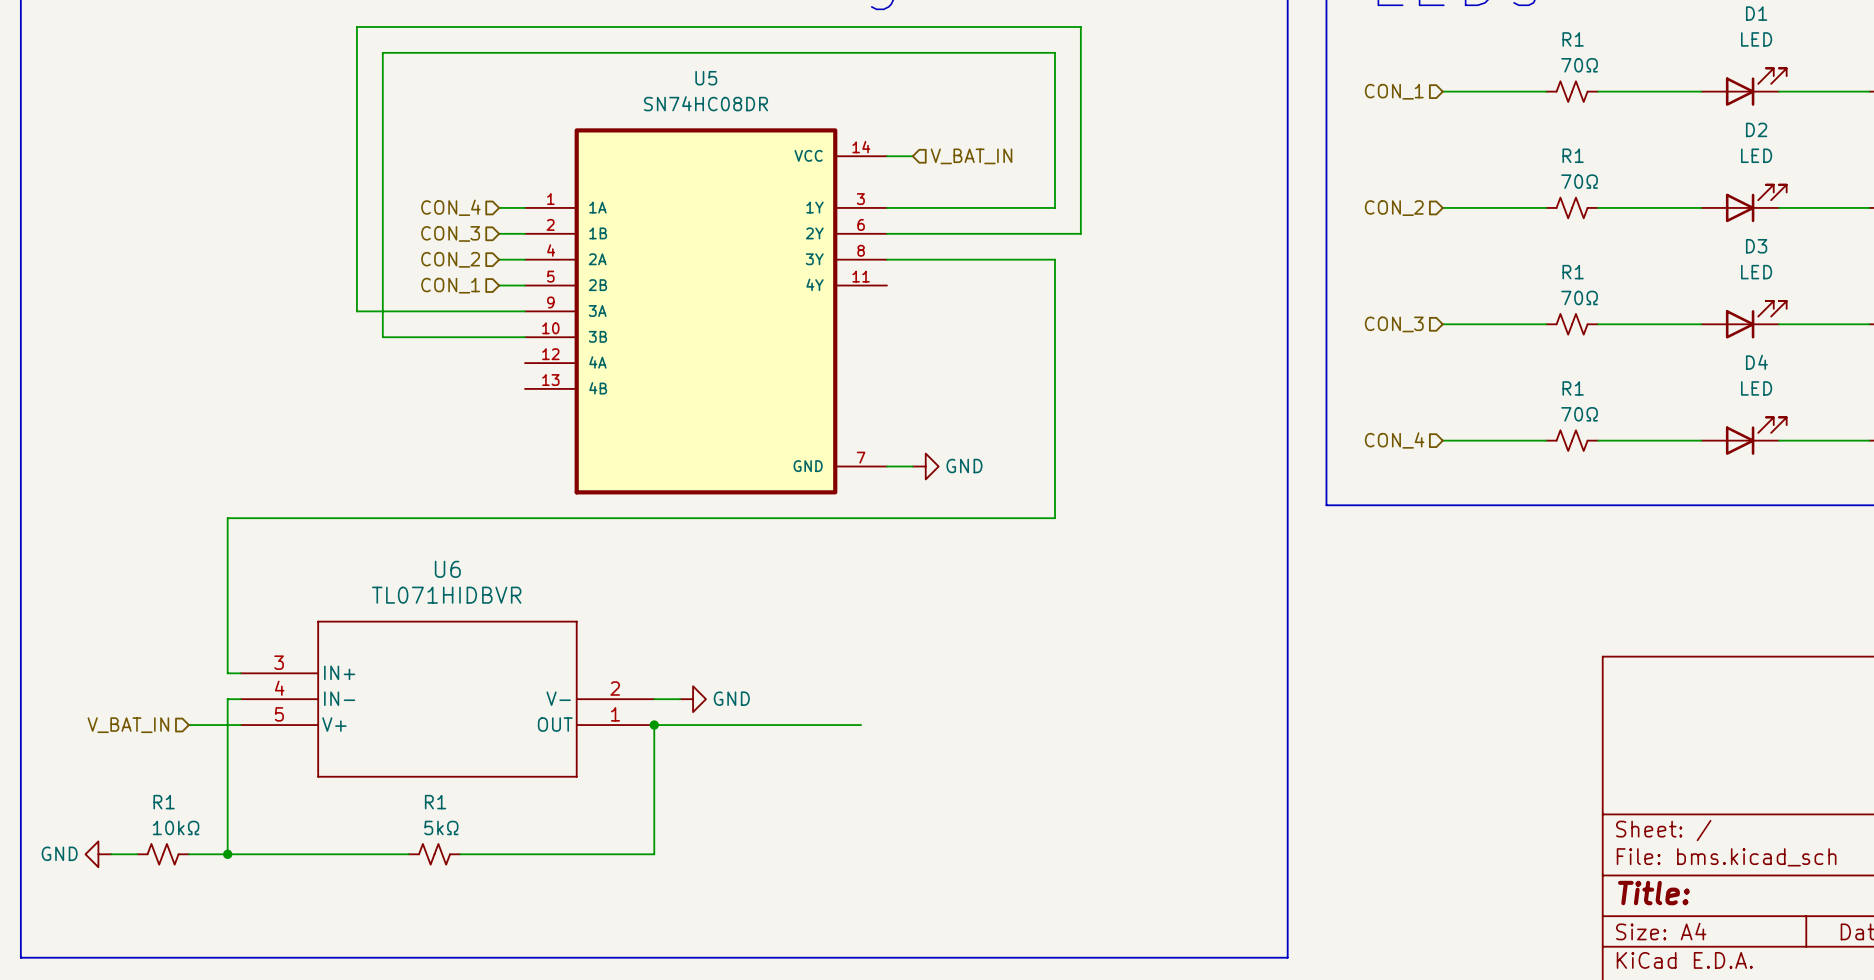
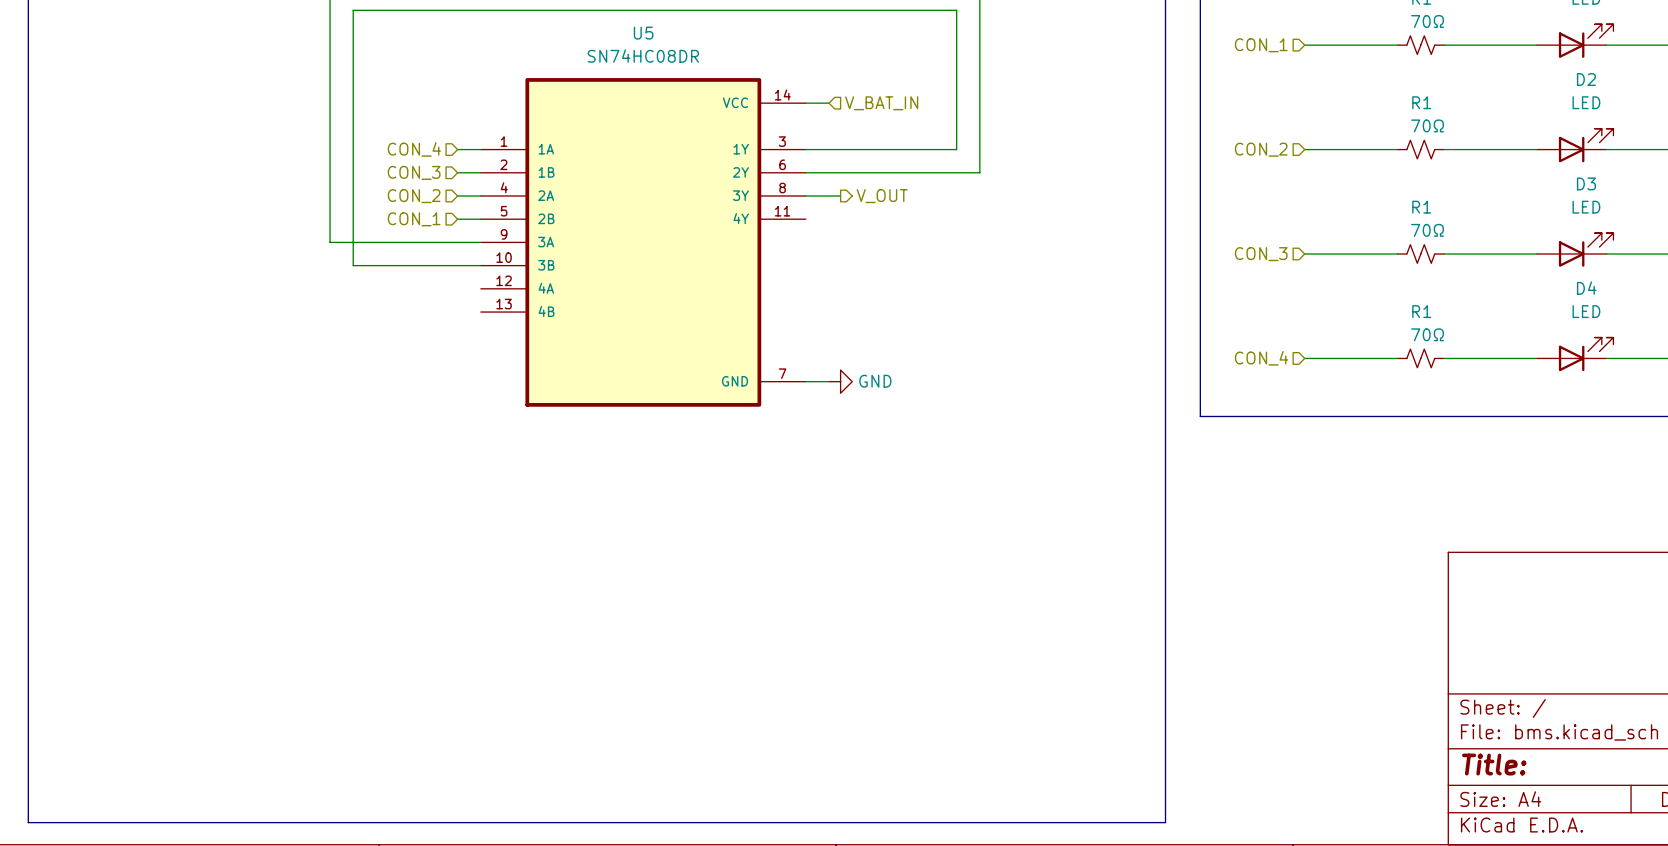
wire: (925, 259) (1055, 259) (1055, 518) (227, 518) (227, 673) (240, 673) -> none
hierarchical label: none -> V_OUT (882, 196)
wire: (240, 699) (227, 699) (227, 854) -> none
U6: TL071HIDBVR (447, 699) -> none
wire: (654, 699) (680, 699) -> none
power symbol: GND (693, 699) -> none
hierarchical label: V_BAT_IN (128, 725) -> none
wire: (188, 725) (240, 725) -> none
junction: (654, 725) -> none
wire: (861, 725) (654, 725) (654, 854) (460, 854) -> none
power symbol: GND (98, 854) -> none
wire: (111, 854) (137, 854) -> none
R1: 10kΩ (163, 854) -> none
wire: (188, 854) (408, 854) -> none
junction: (227, 854) -> none
R1: 5kΩ (434, 854) -> none

